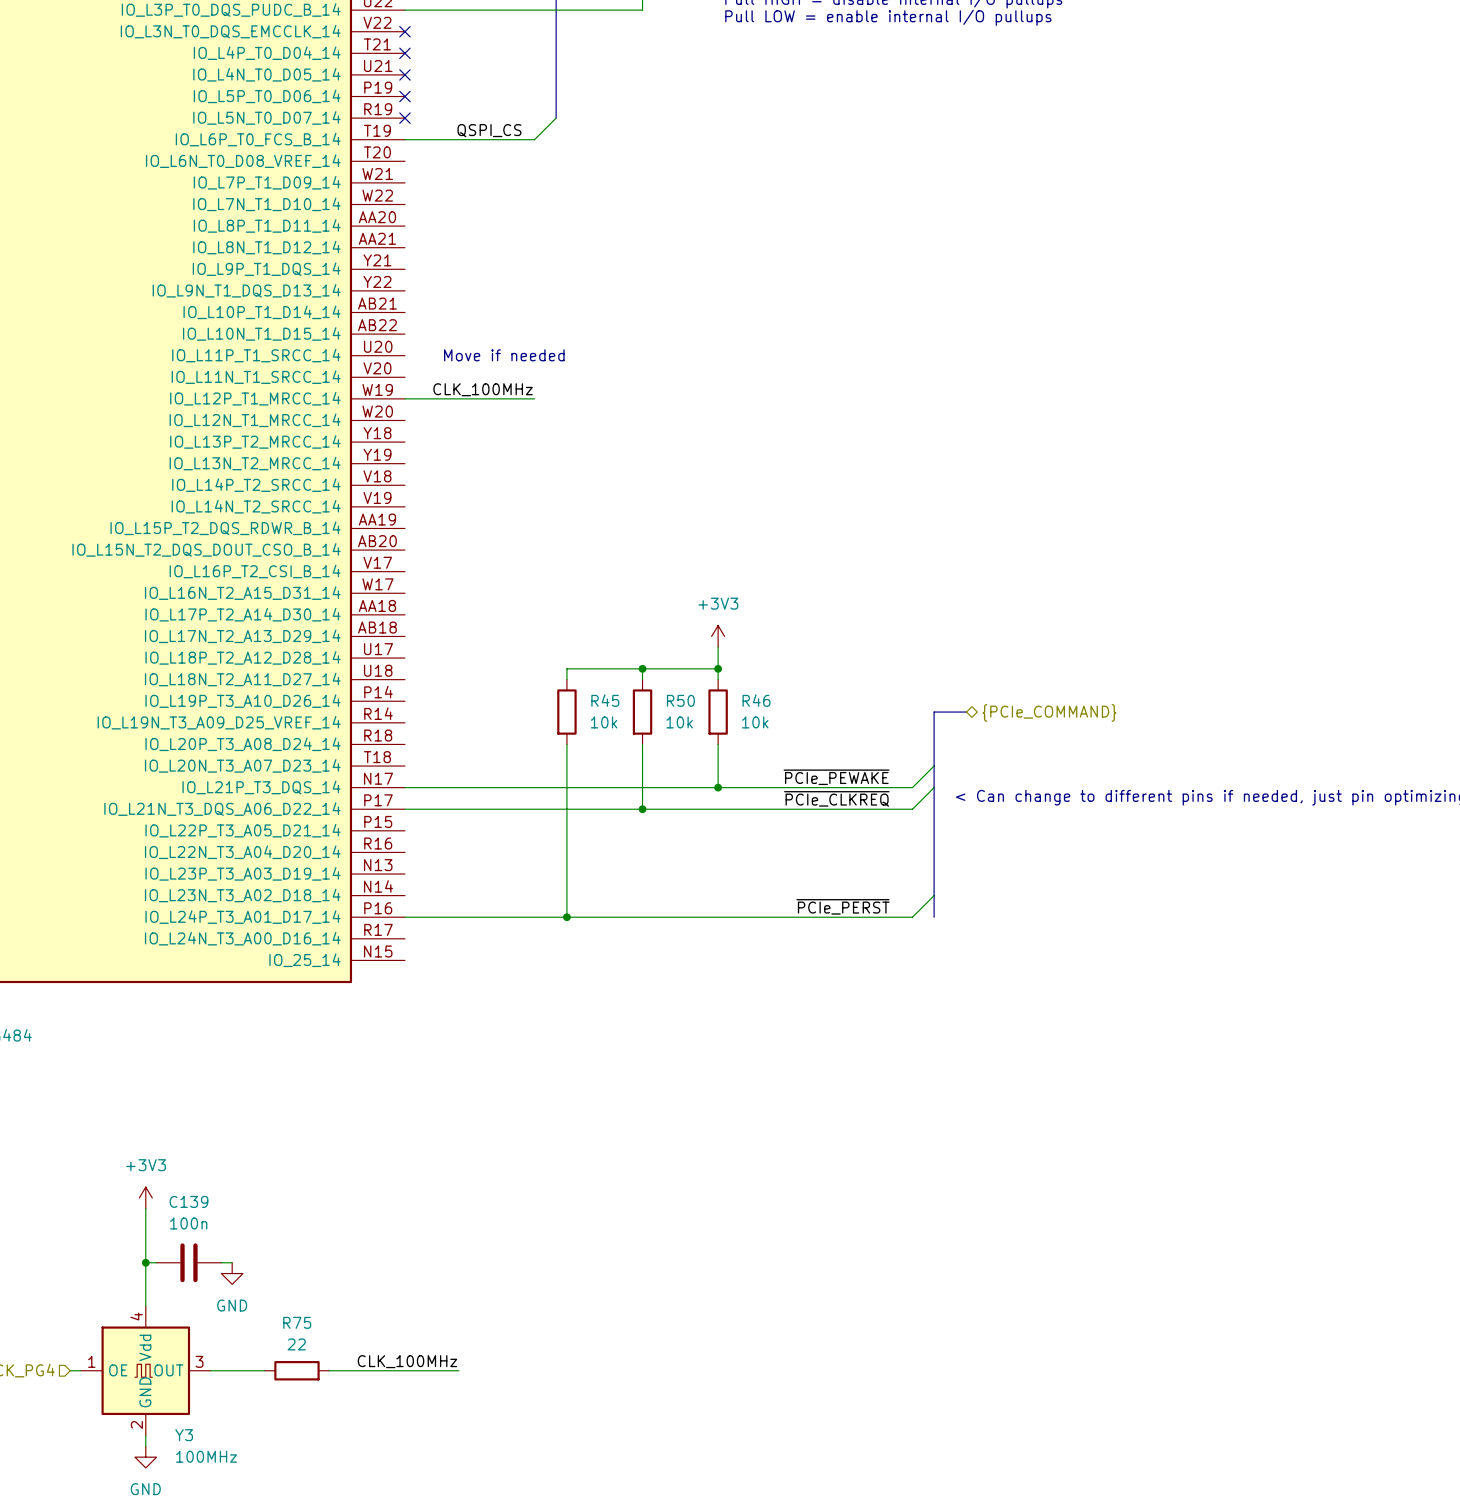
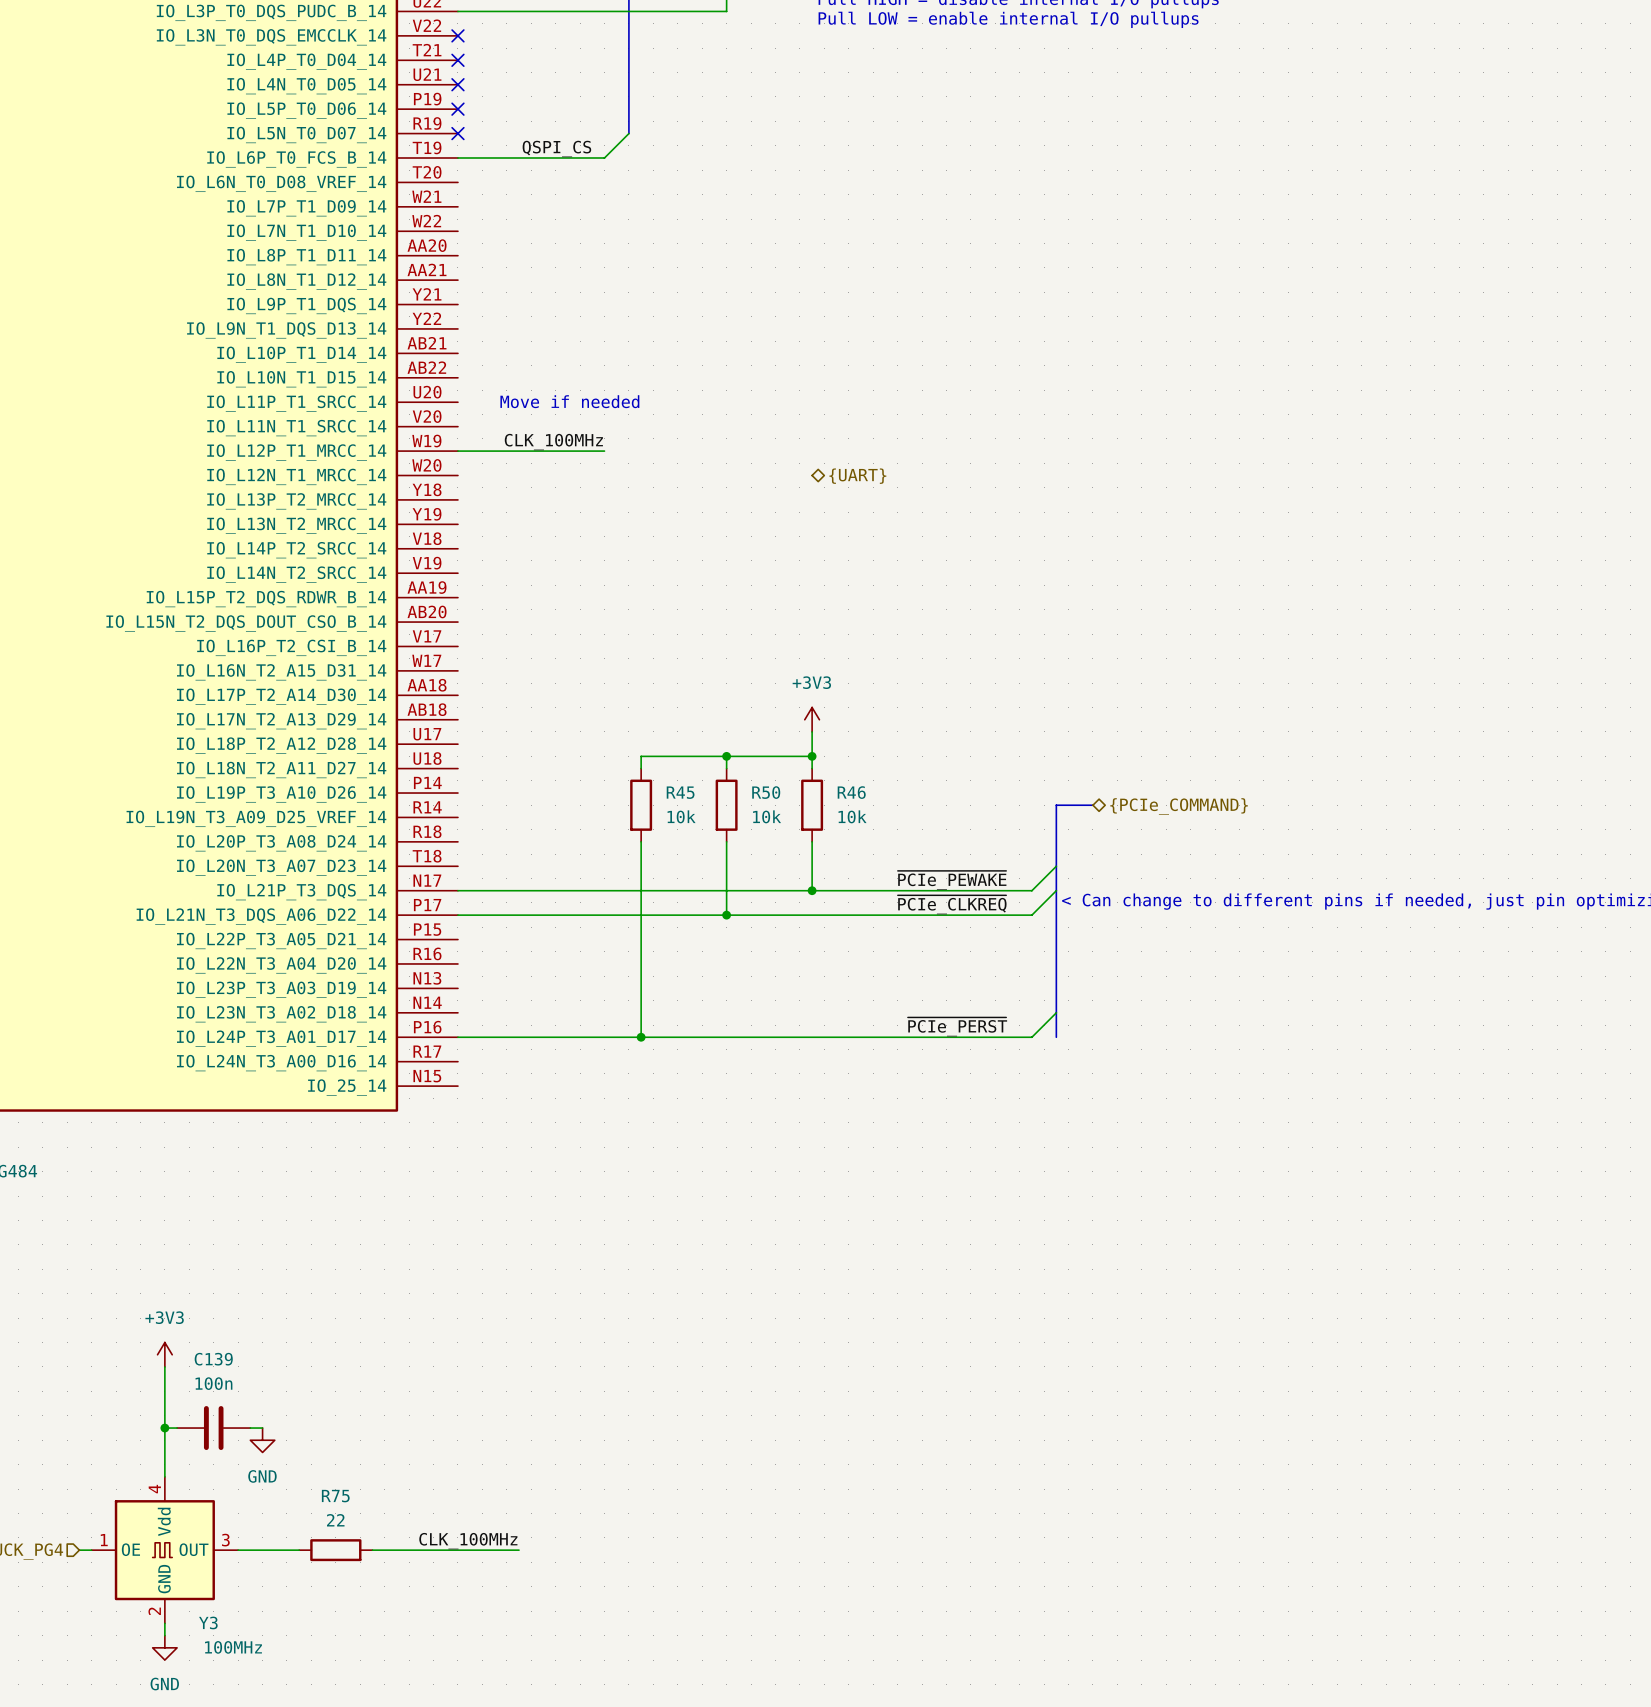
hierarchical label: none -> {UART} (857, 476)

